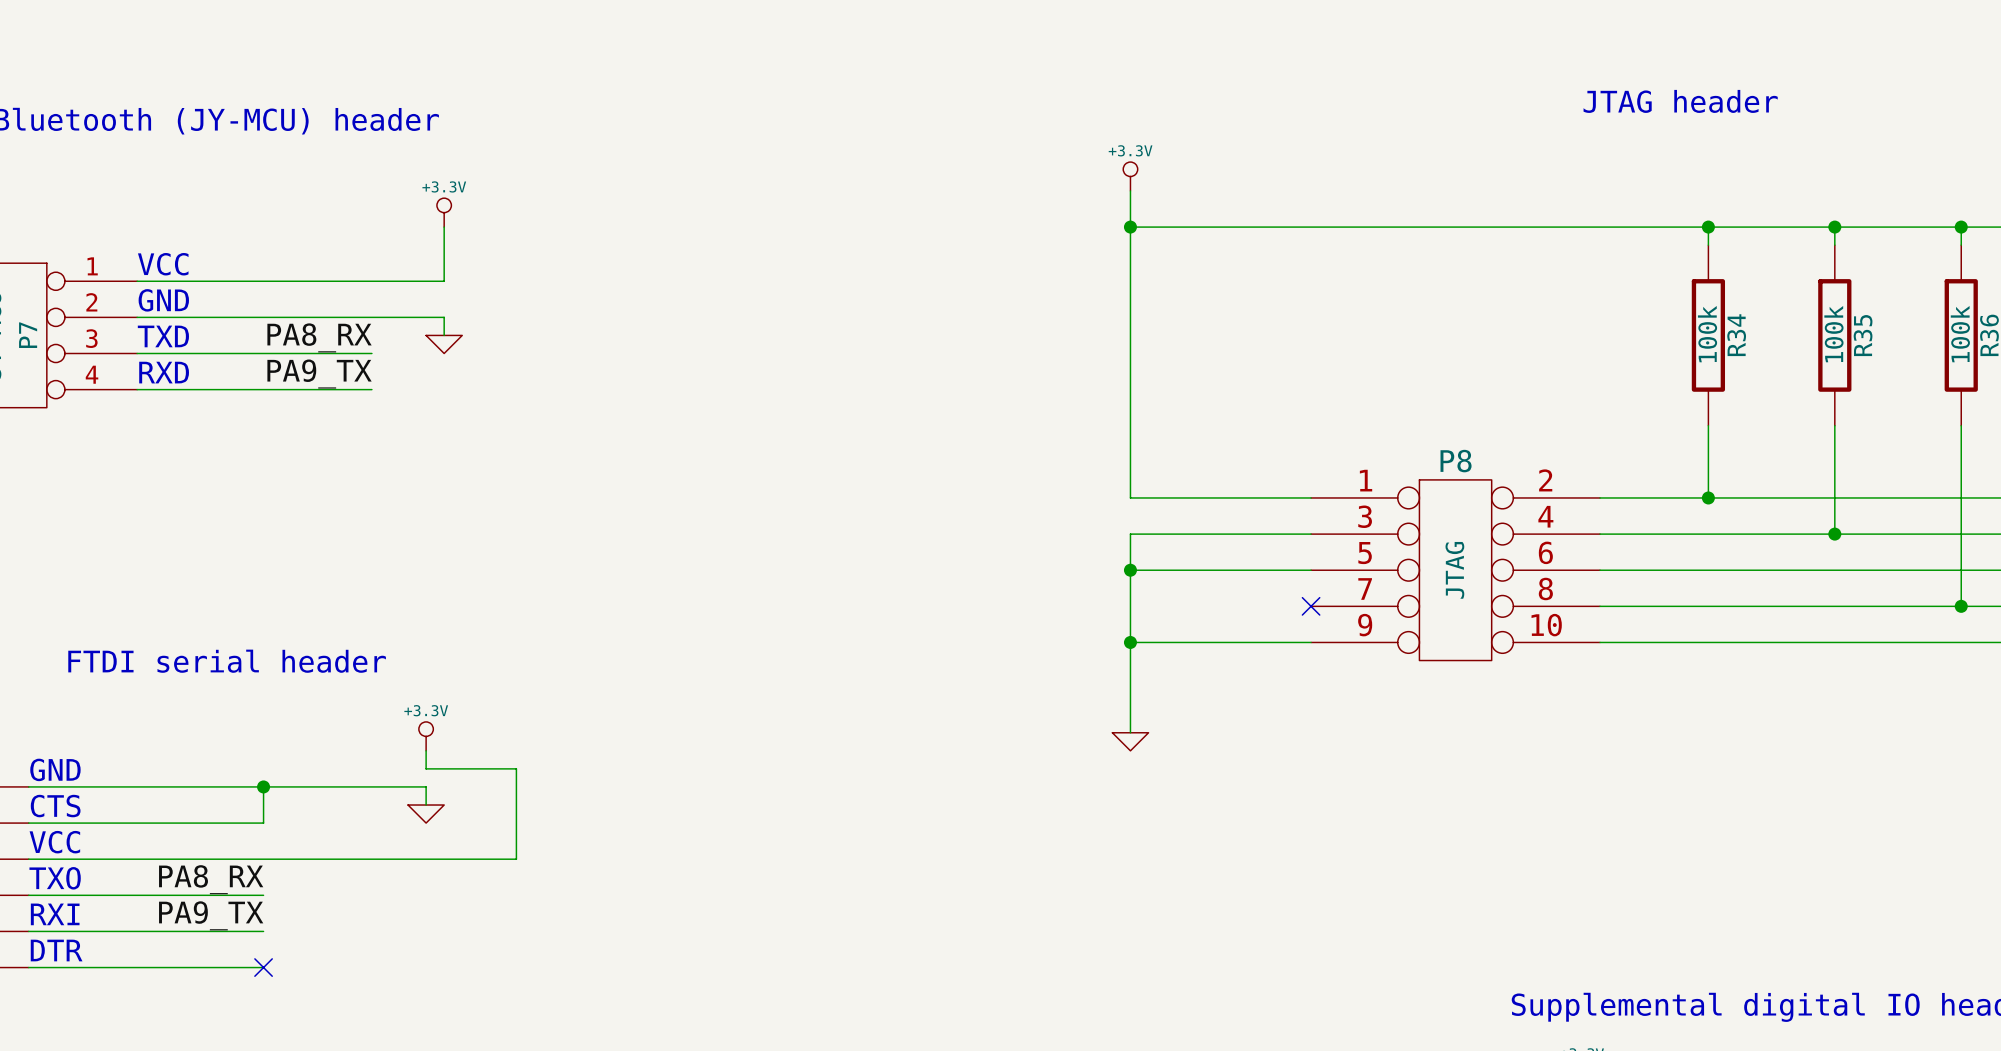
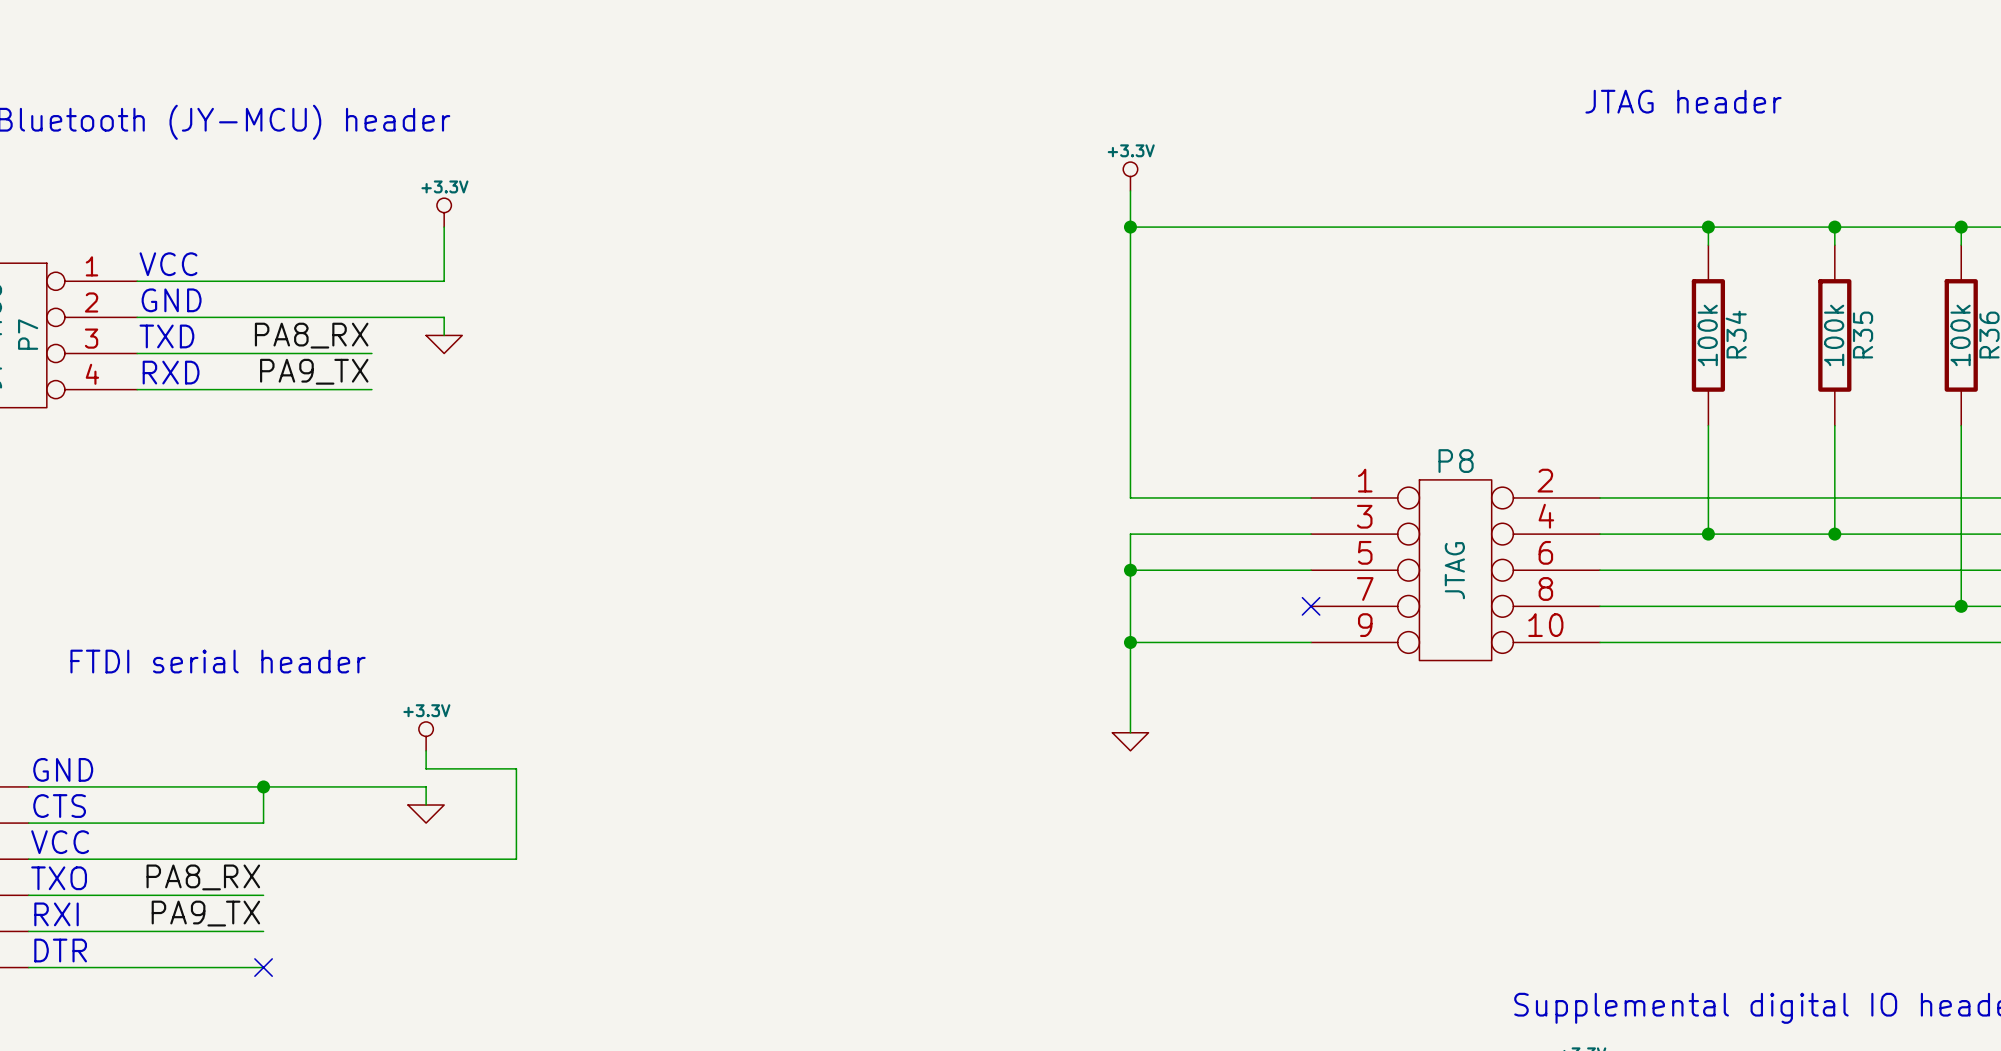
wire: none -> (1708, 497) (1708, 534)
junction position: (1708, 497) -> (1708, 534)

